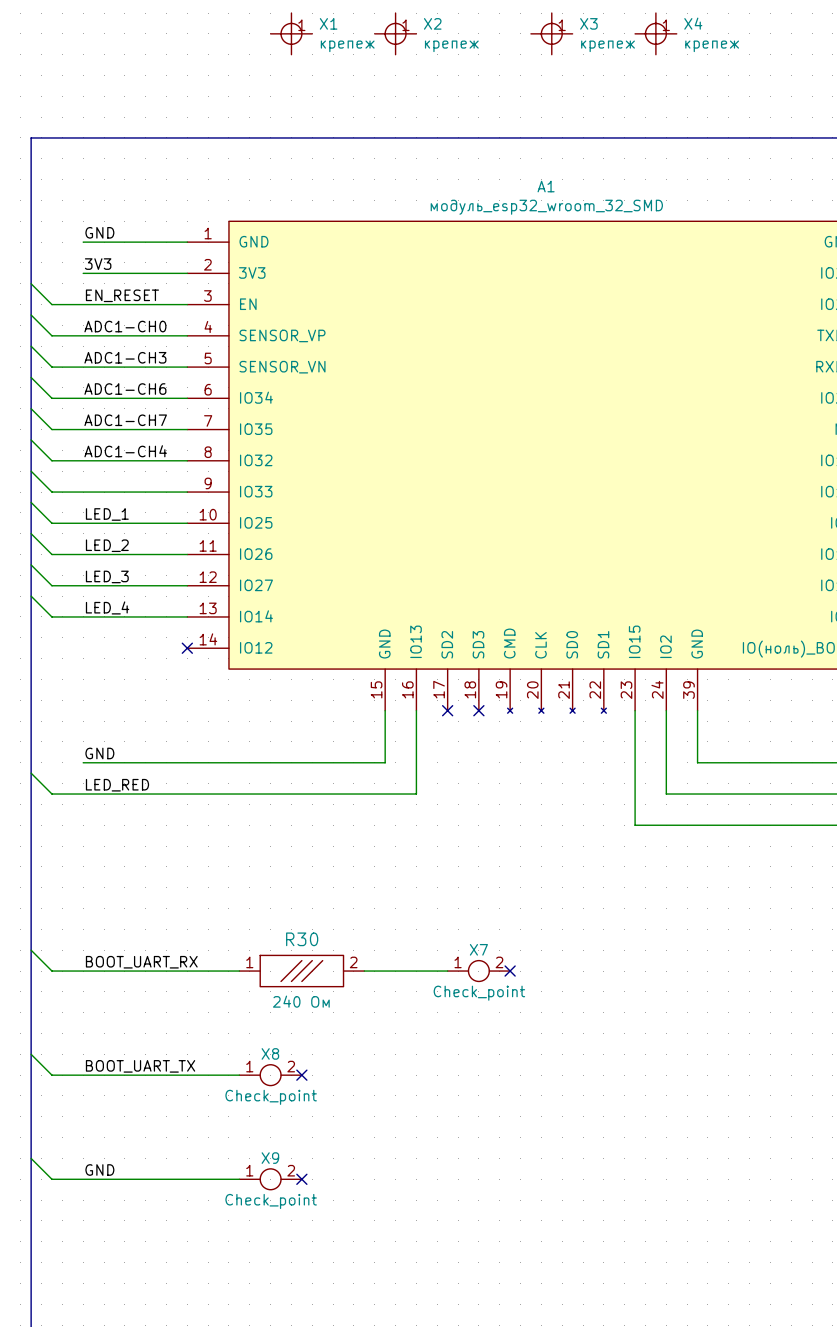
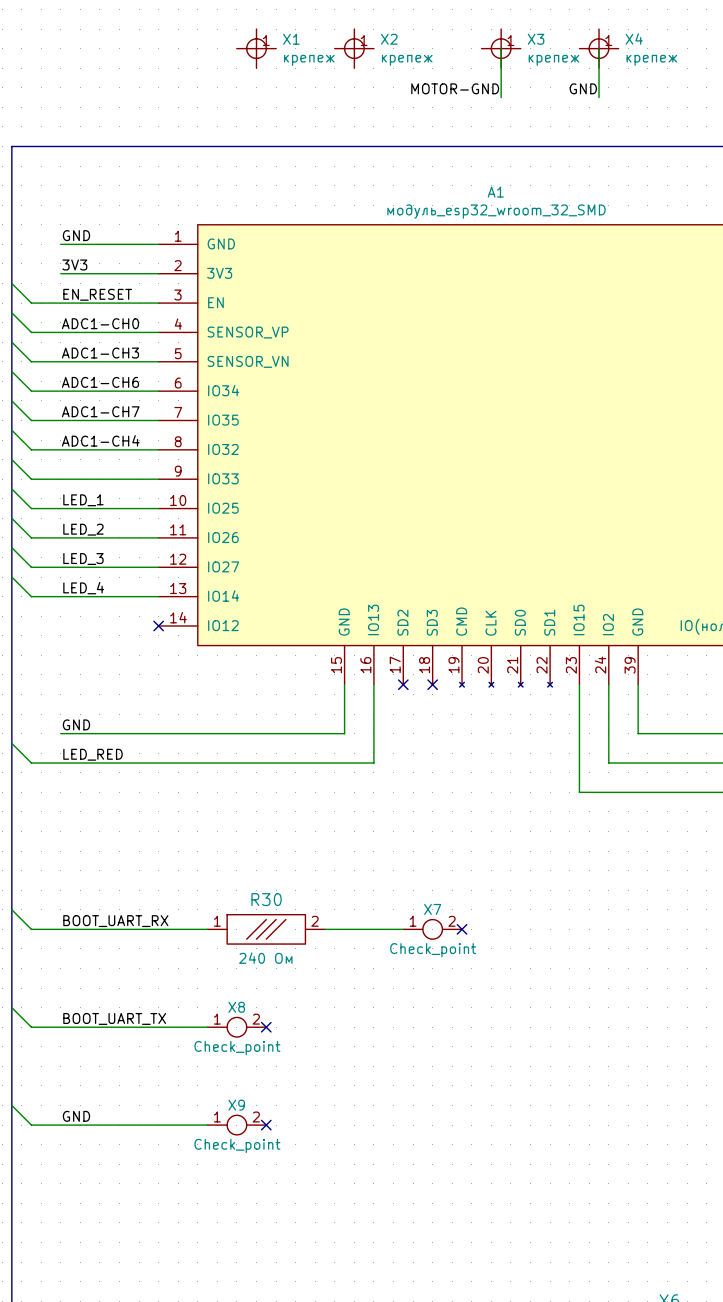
wire: none -> (501, 48) (501, 97)
wire: none -> (599, 48) (599, 97)
label: none -> MOTOR-GND (455, 88)
label: none -> GND (583, 88)

